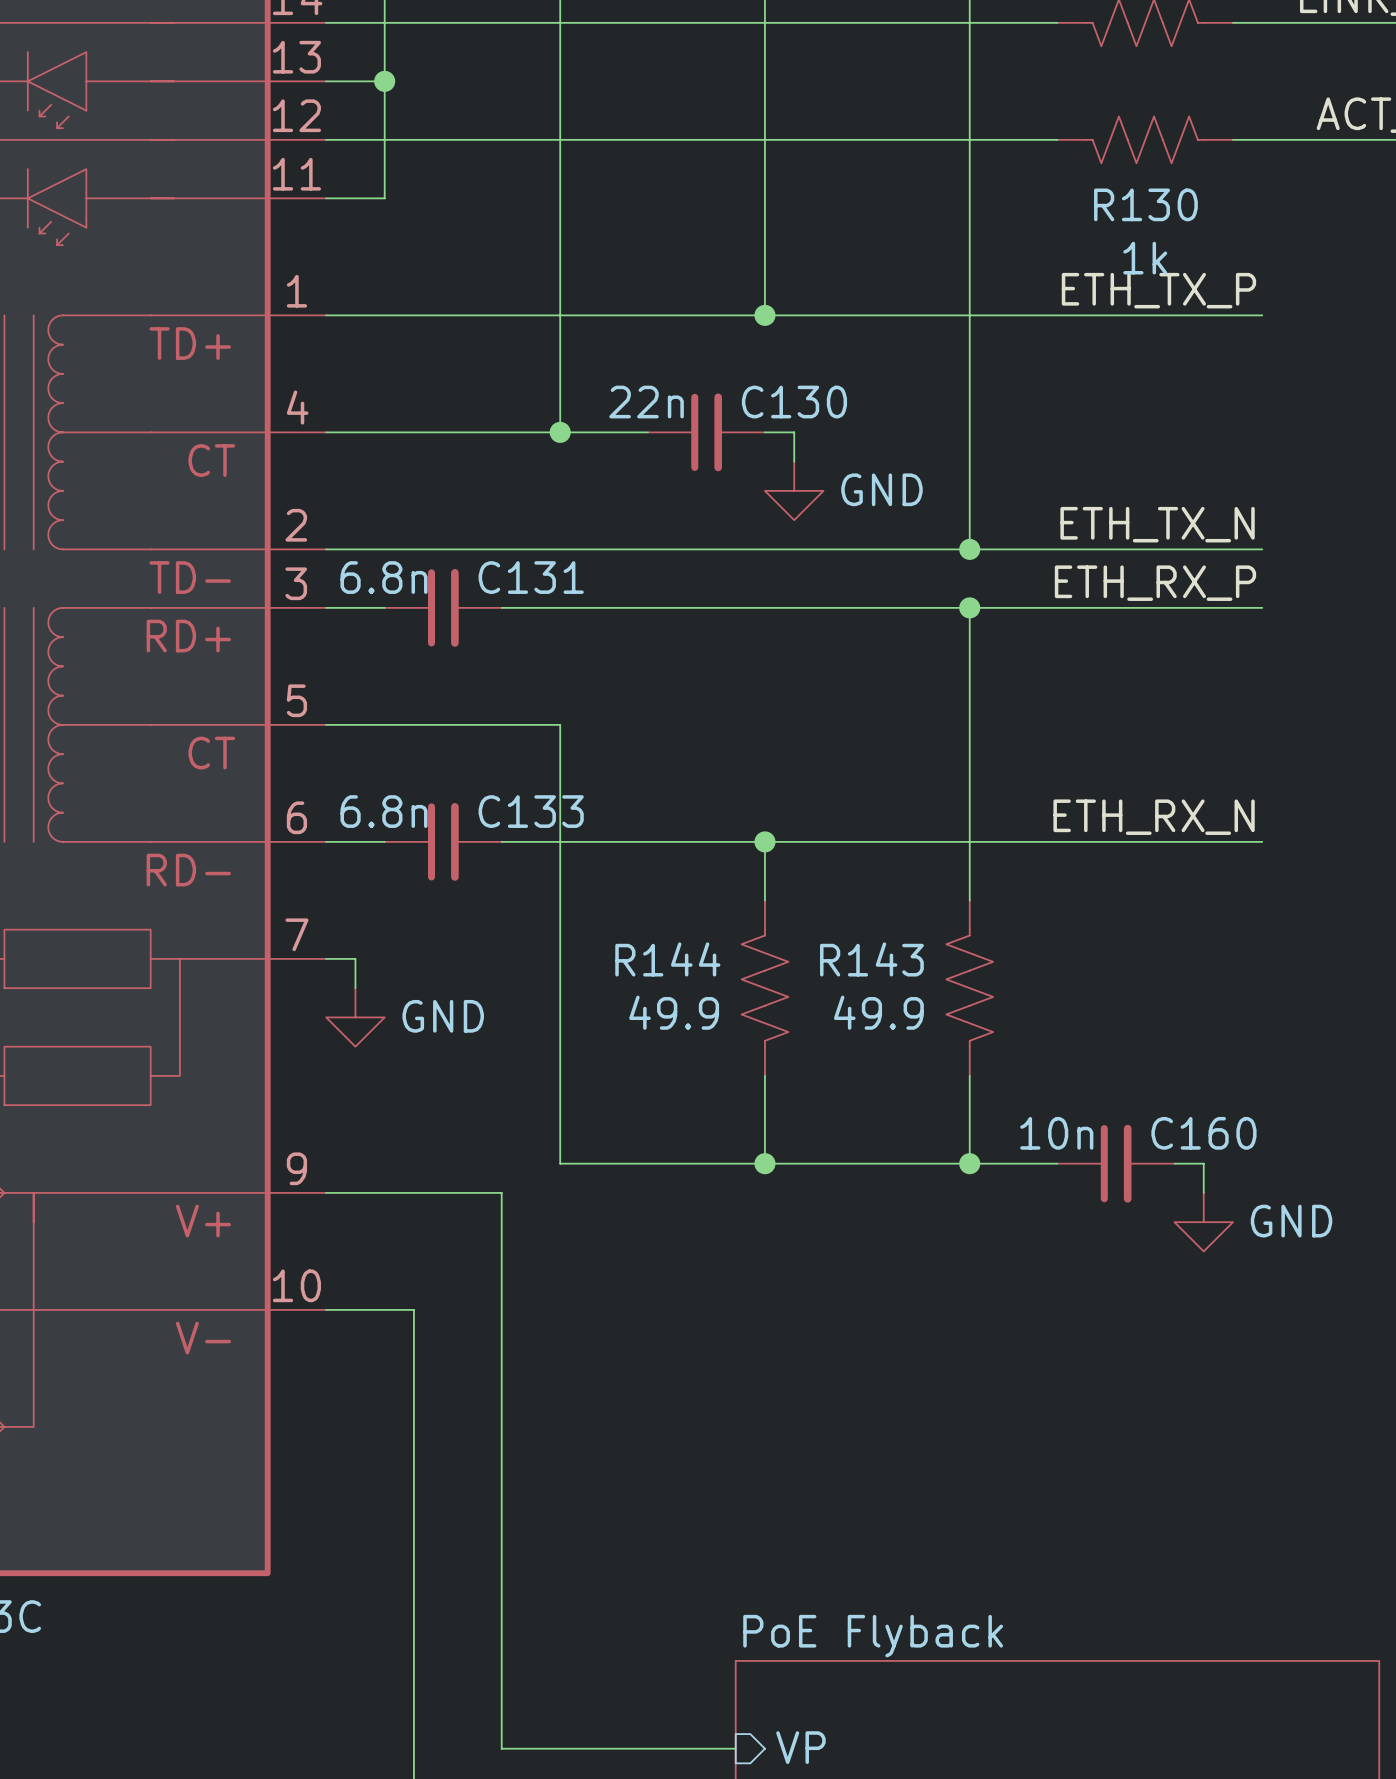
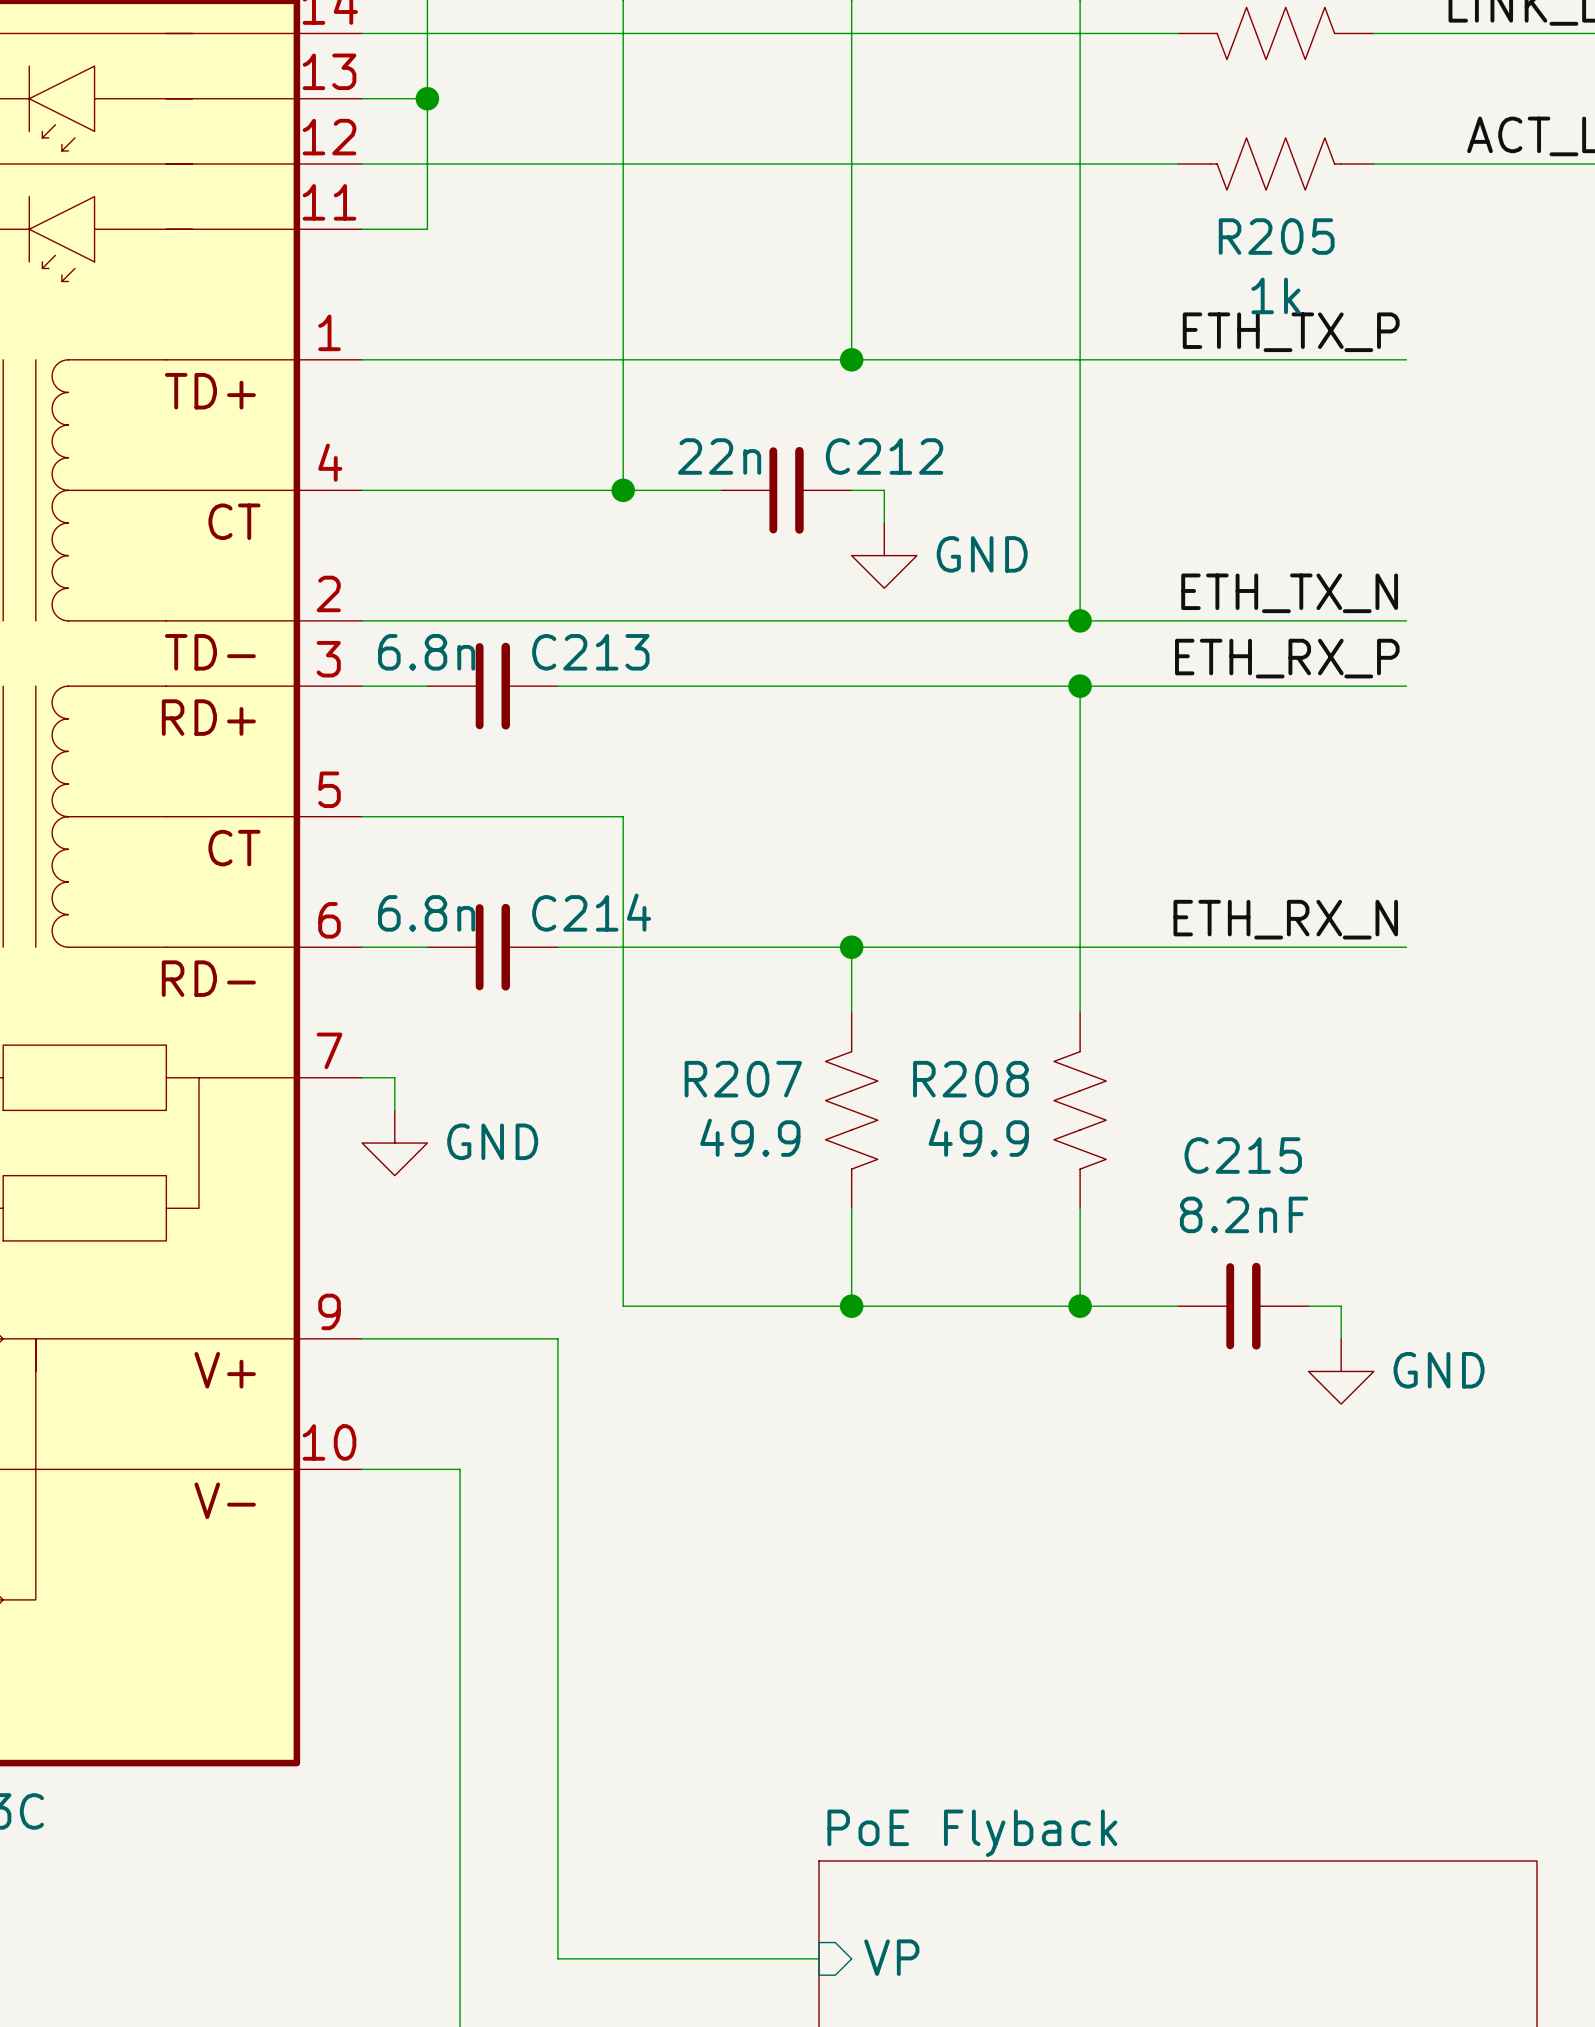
R130 name: R130 (1145, 204) -> R205 (1276, 236)
C130 name: C130 (794, 402) -> C212 (884, 456)
C131 name: C131 (531, 577) -> C213 (590, 652)
C133 name: C133 (531, 811) -> C214 (591, 912)
R144 name: R144 (667, 959) -> R207 (743, 1079)
R143 name: R143 (871, 959) -> R208 (970, 1079)
C160 value: 10n (1056, 1133) -> 8.2nF (1244, 1214)
C160 name: C160 (1203, 1133) -> C215 (1243, 1155)

